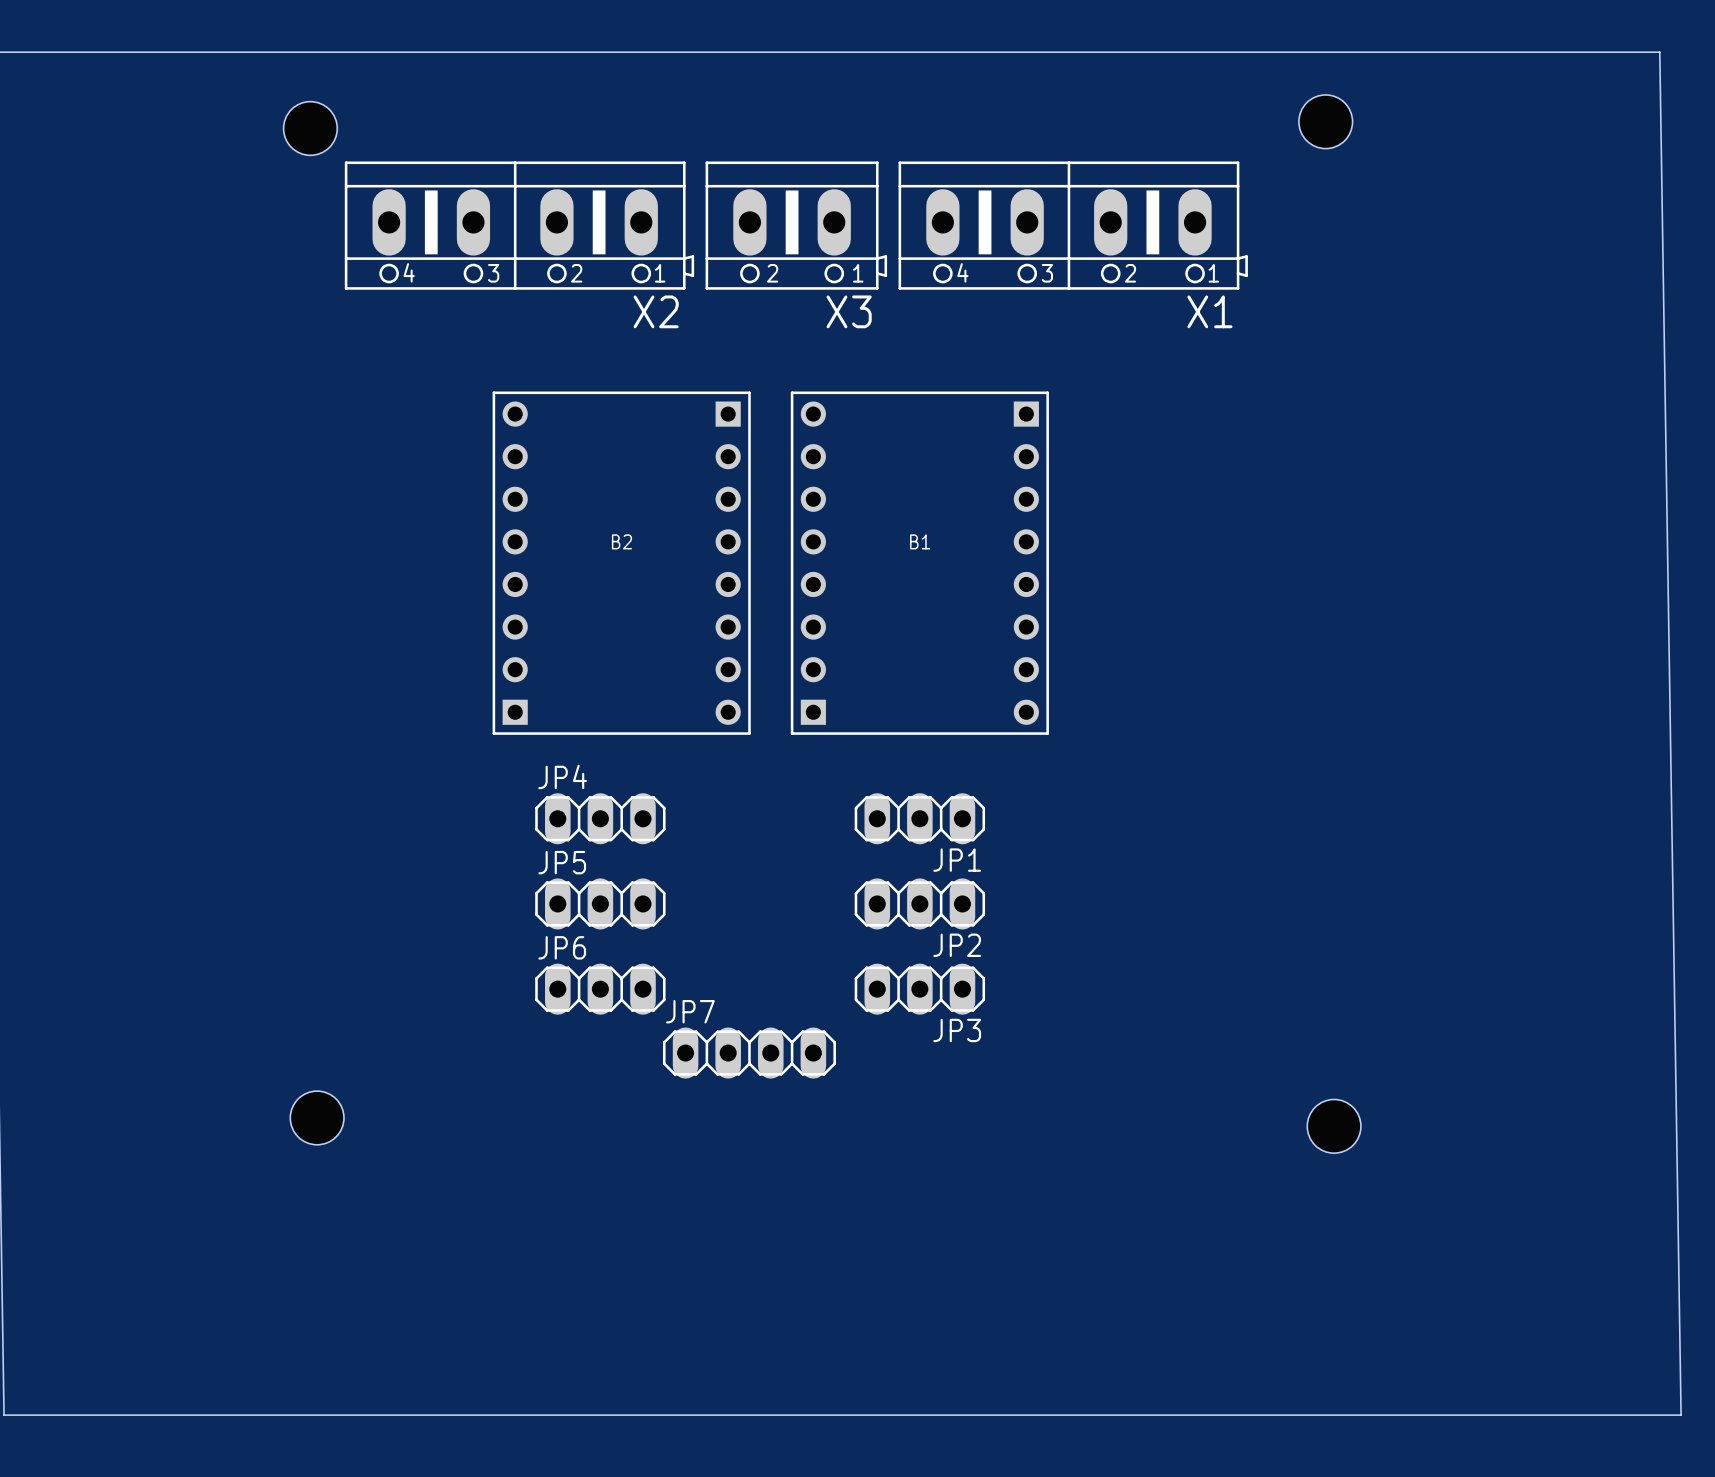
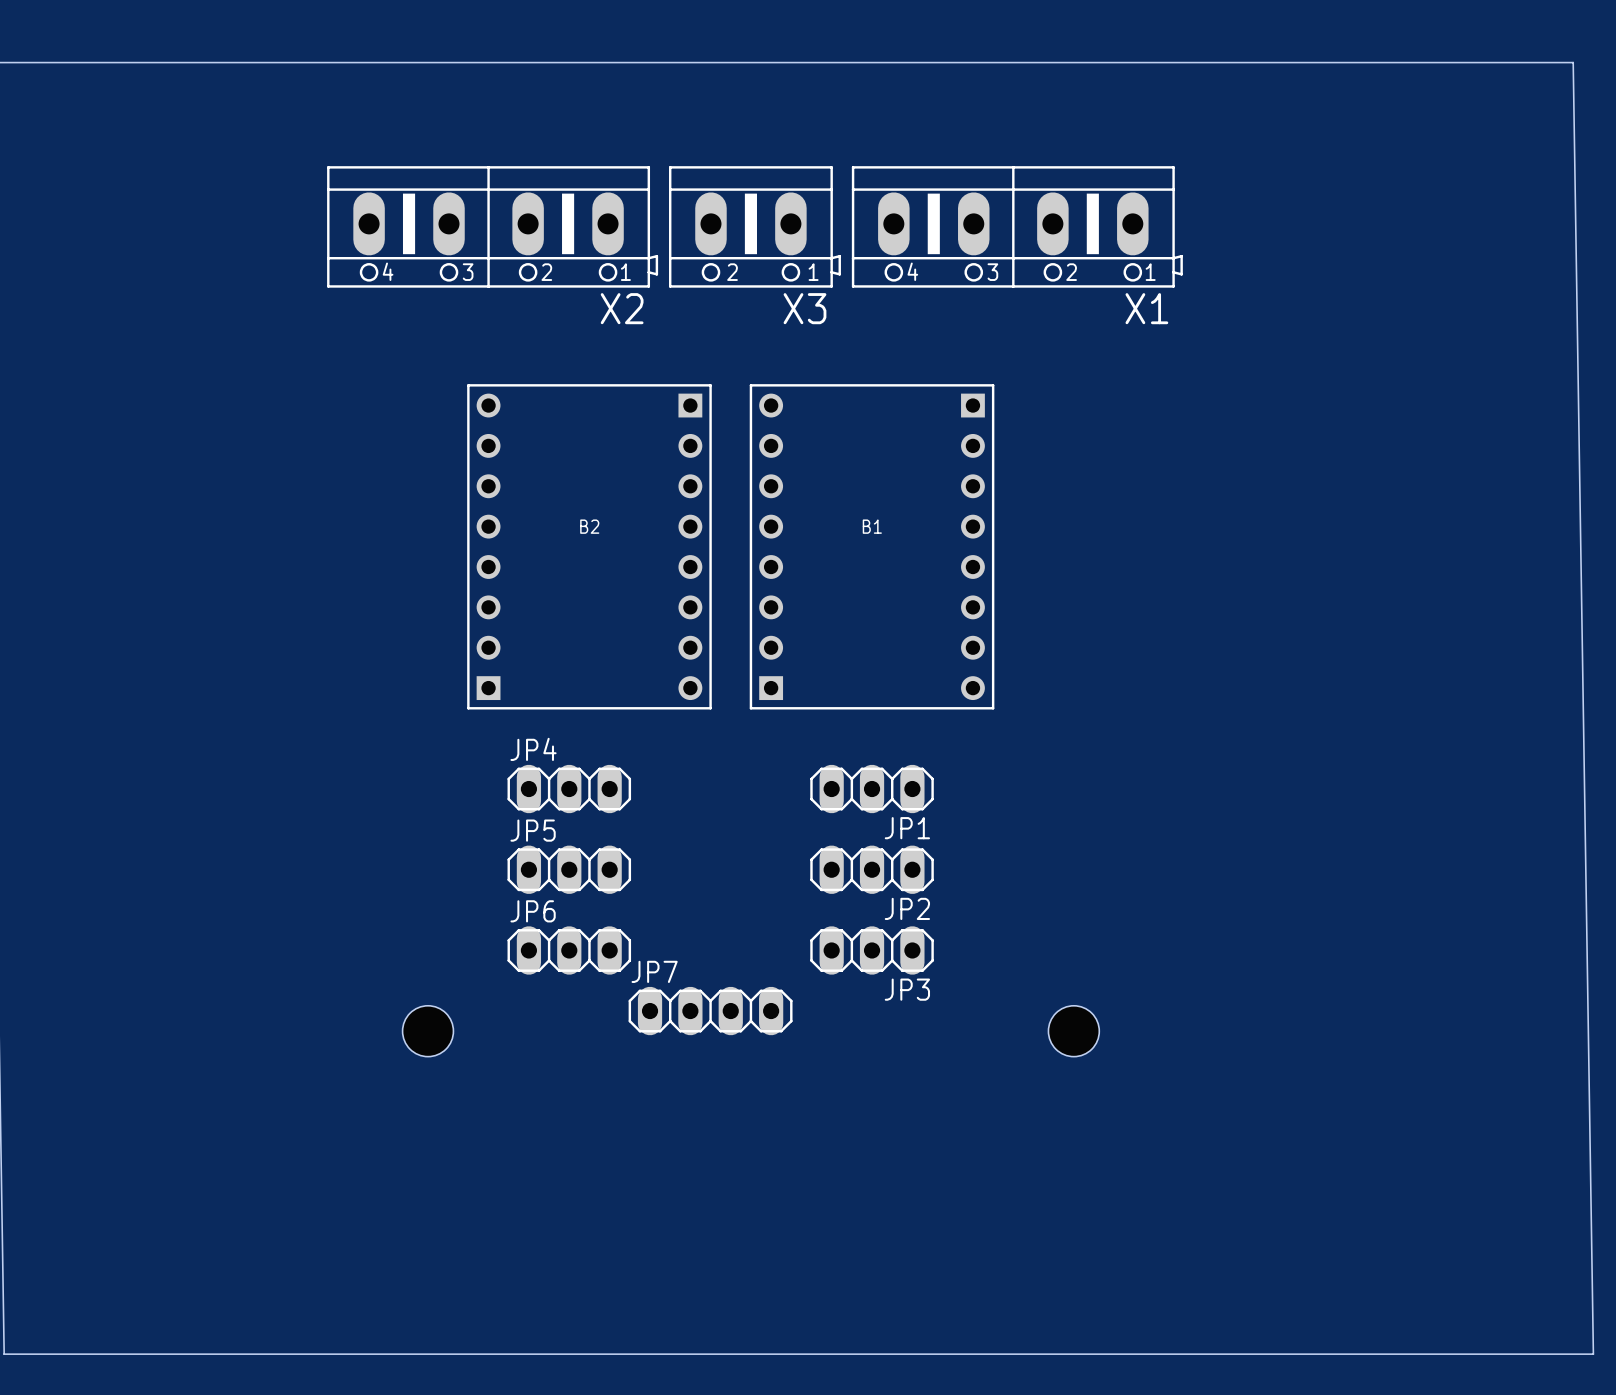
hole: (1325, 121) -> none
hole: (310, 128) -> none
hole position: (317, 1117) -> (428, 1031)
hole position: (1334, 1126) -> (1073, 1031)

